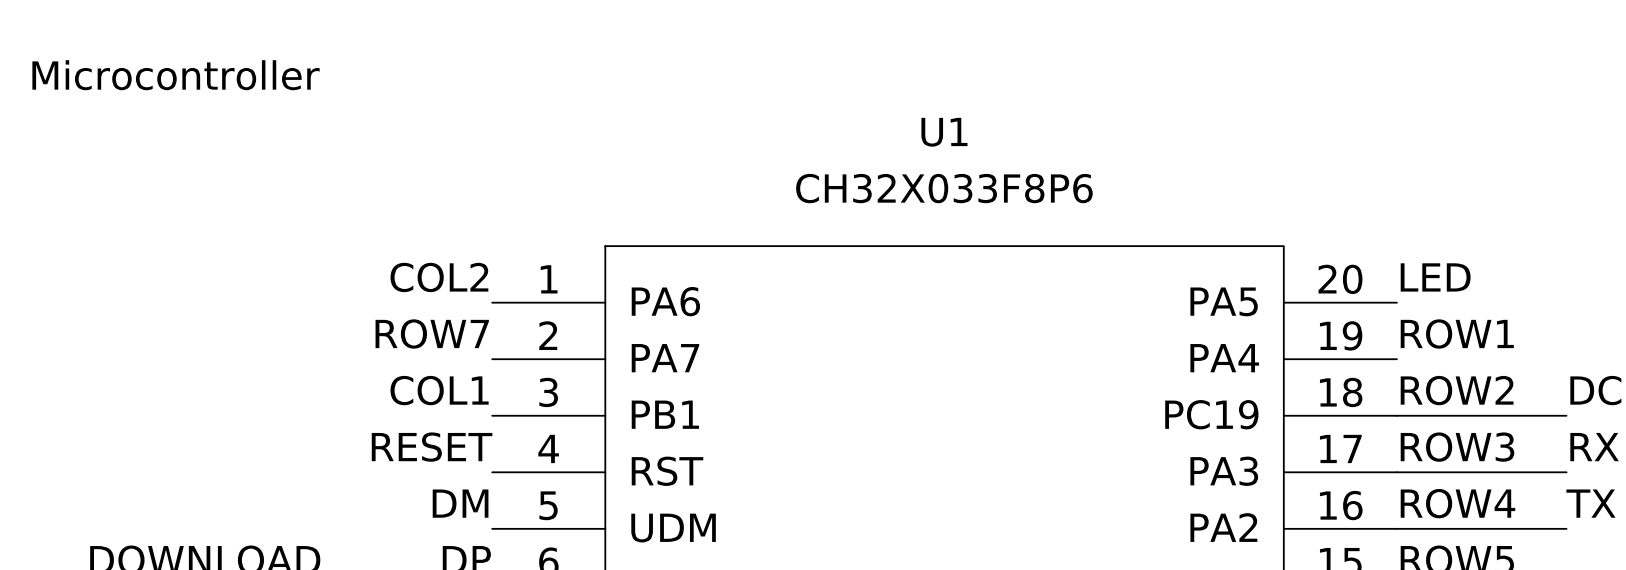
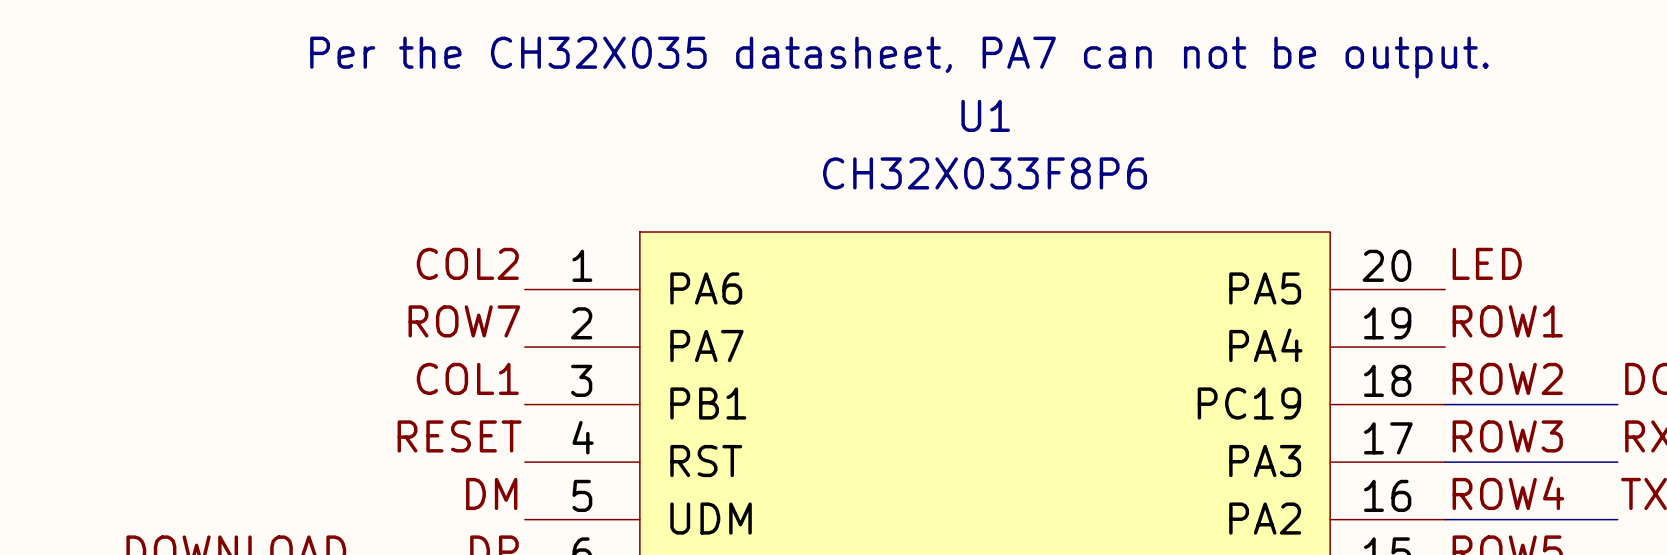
text: none -> Per the CH32X035 datasheet, PA7 can not be output. (899, 57)
text: Microcontroller (176, 75) -> none

